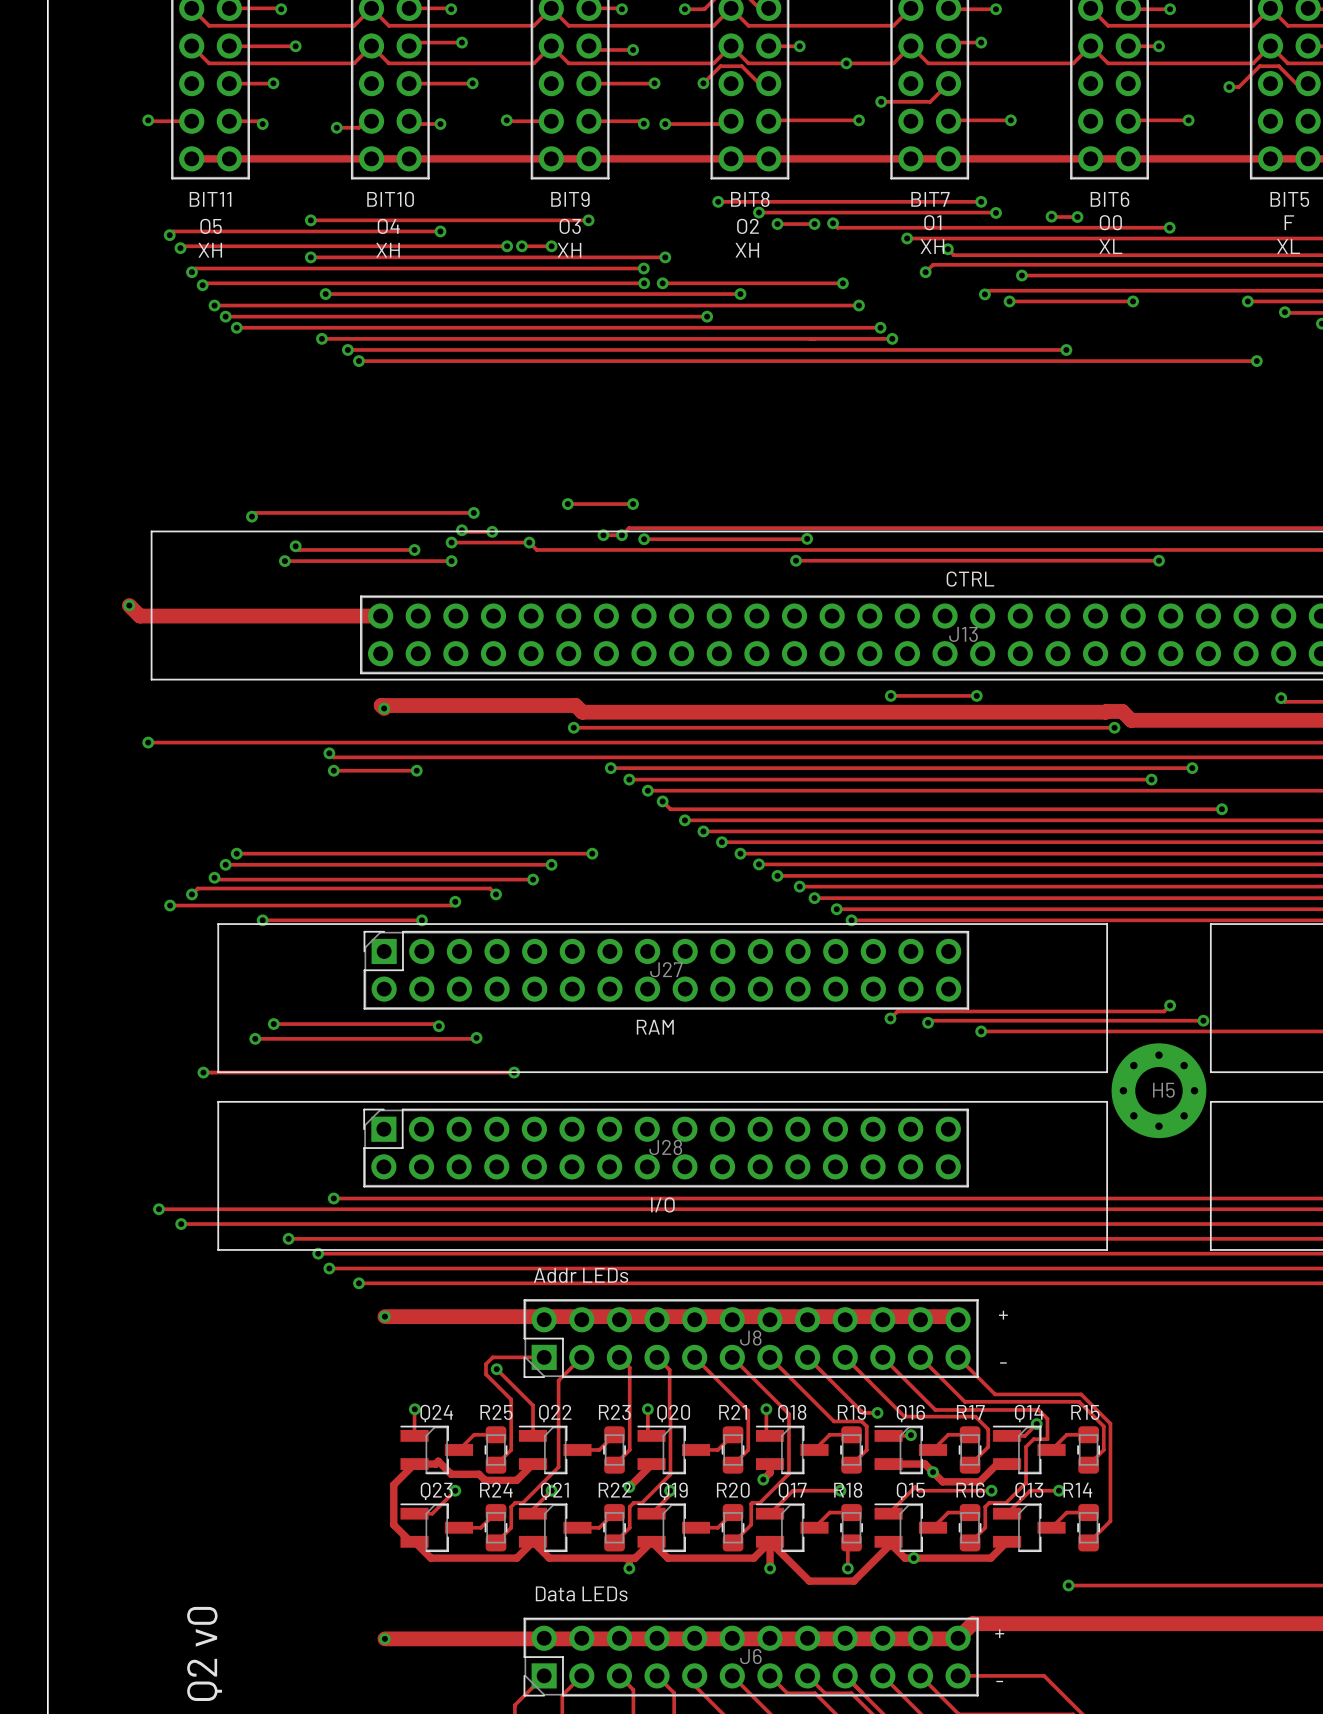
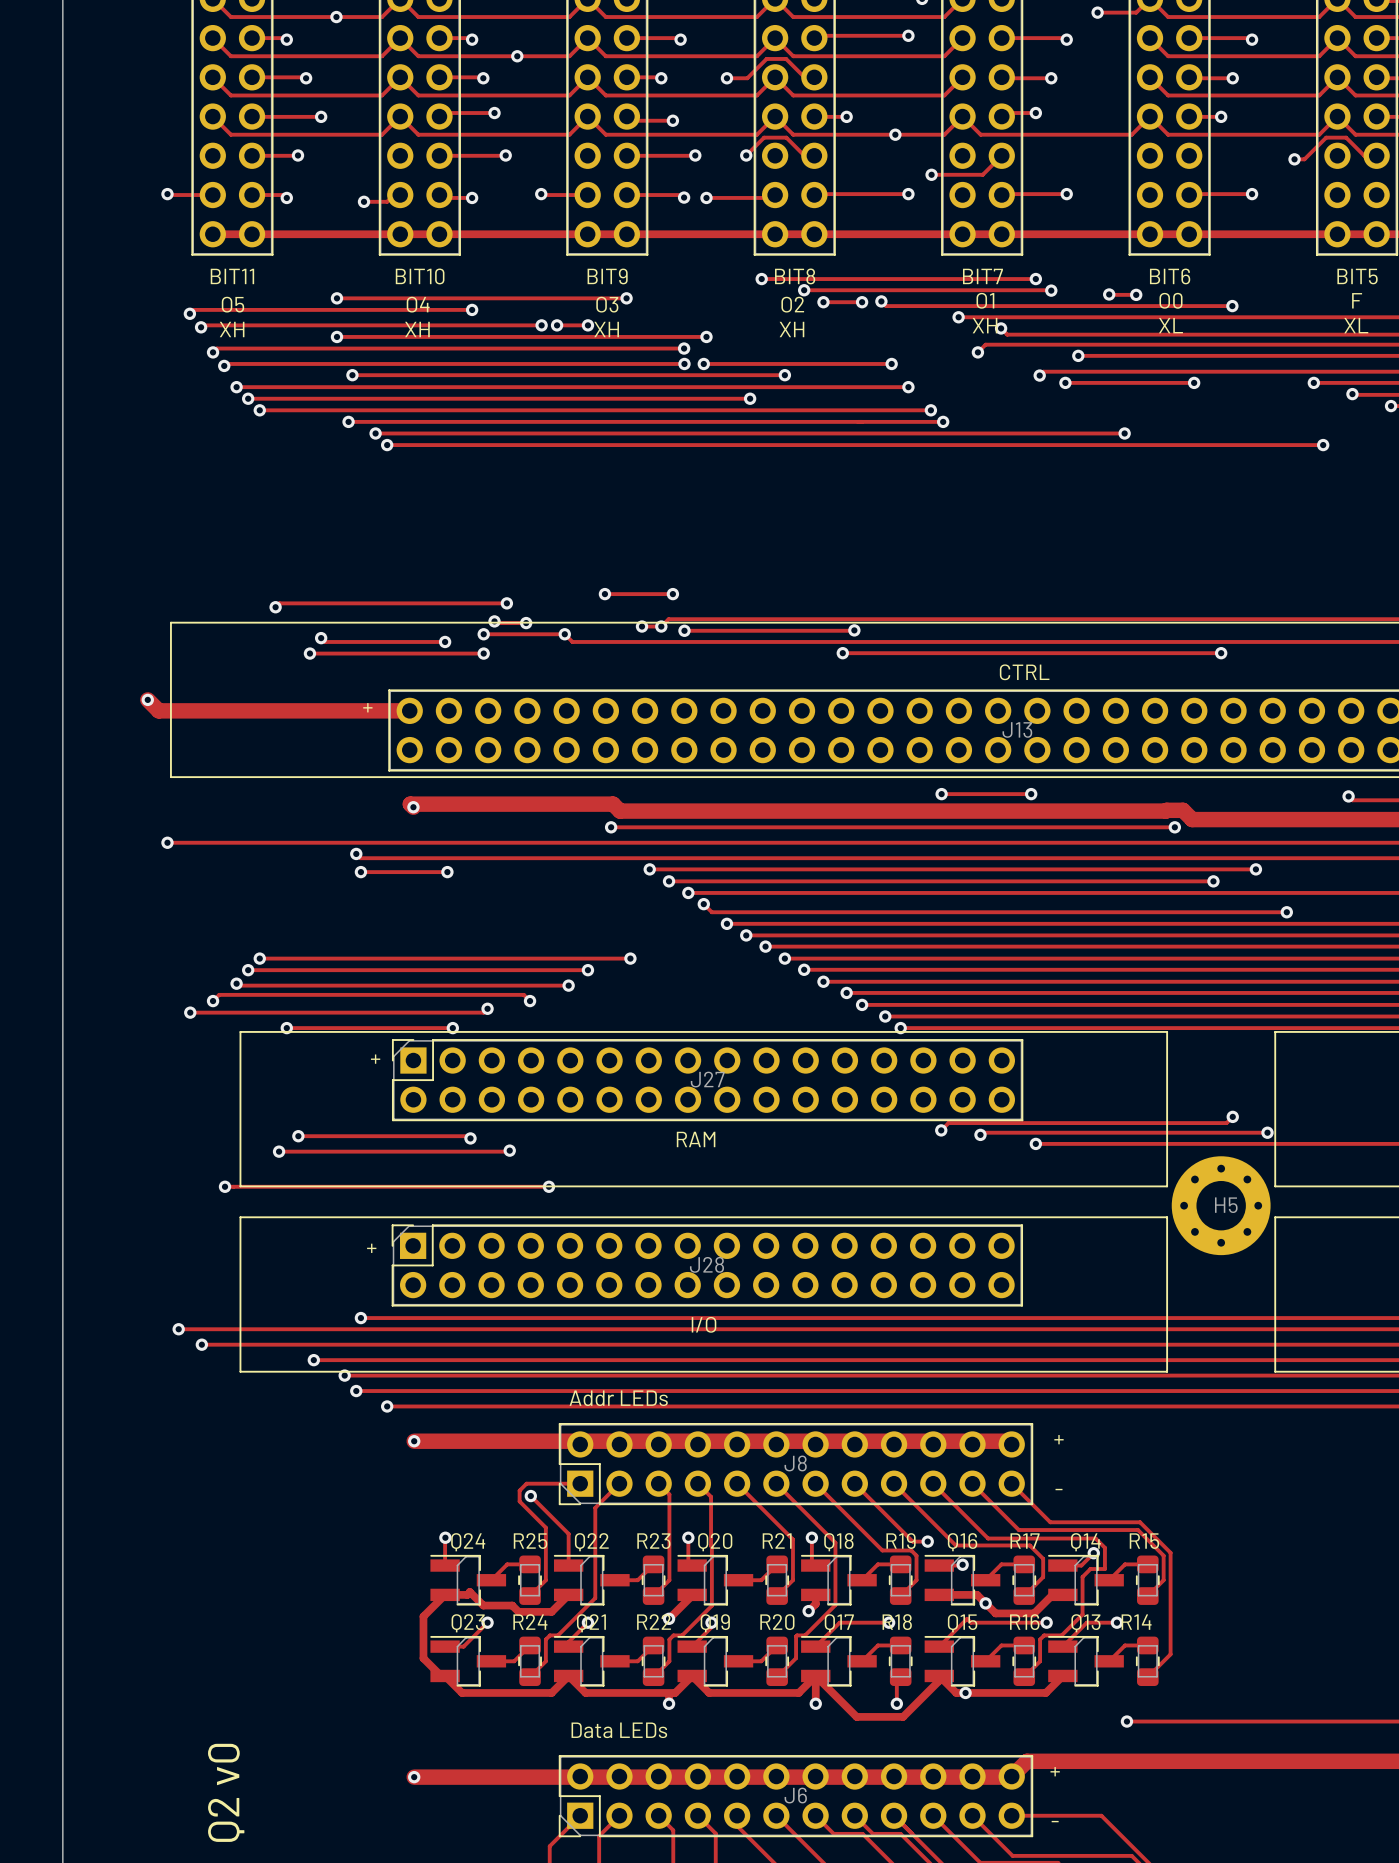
text: none -> + (367, 707)
text: none -> + (375, 1059)
text: none -> + (371, 1248)

